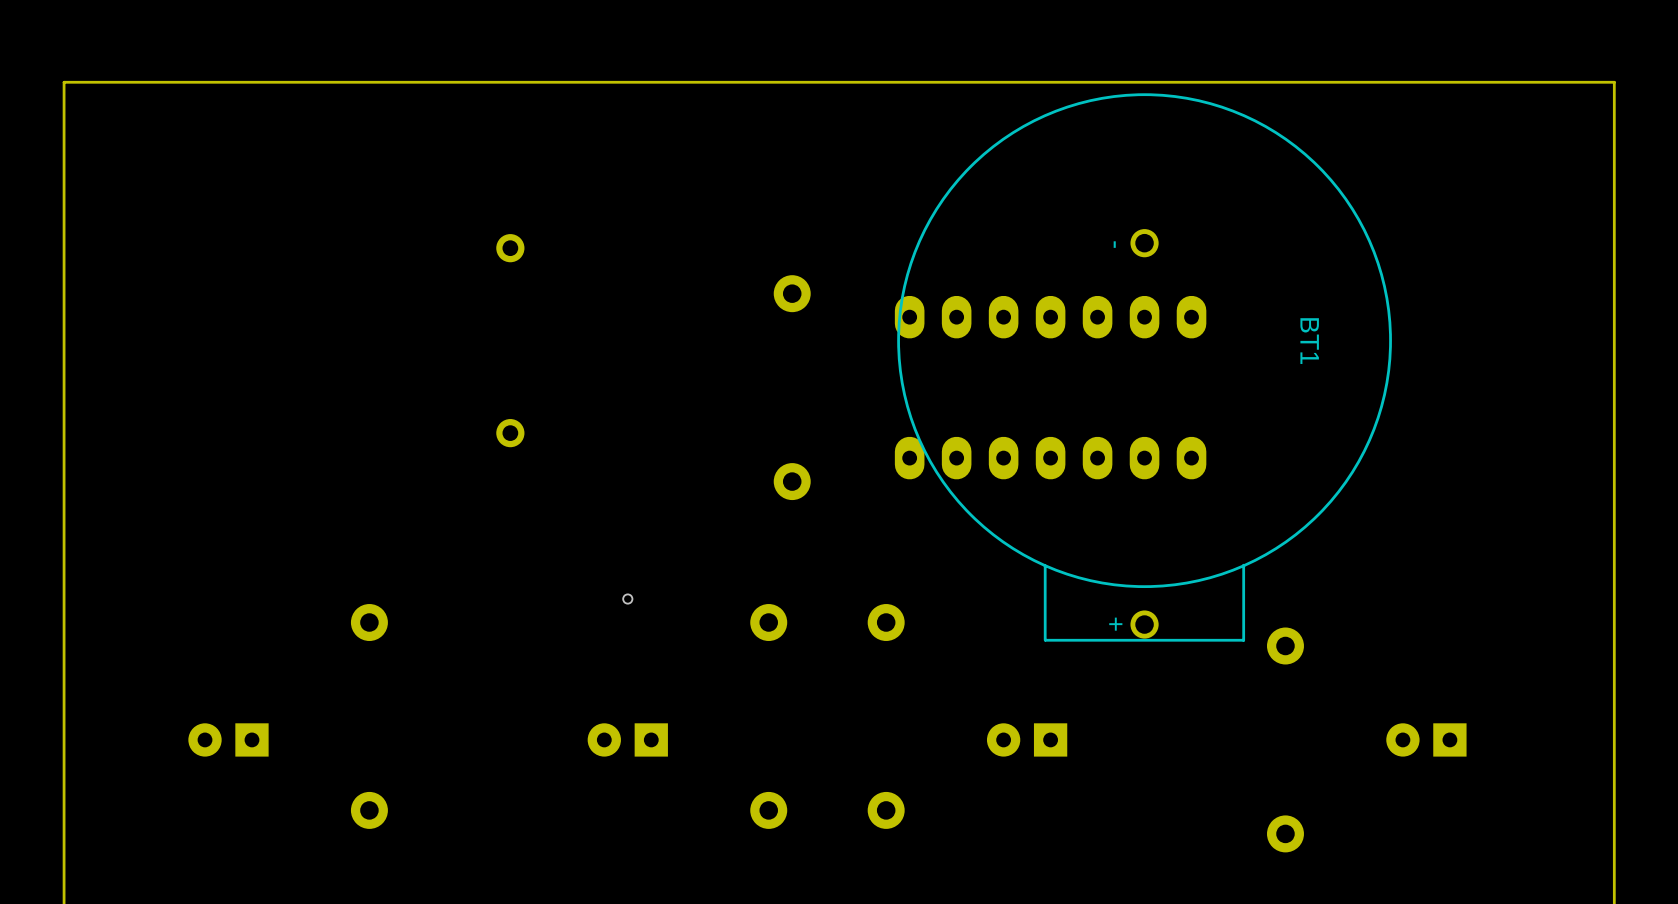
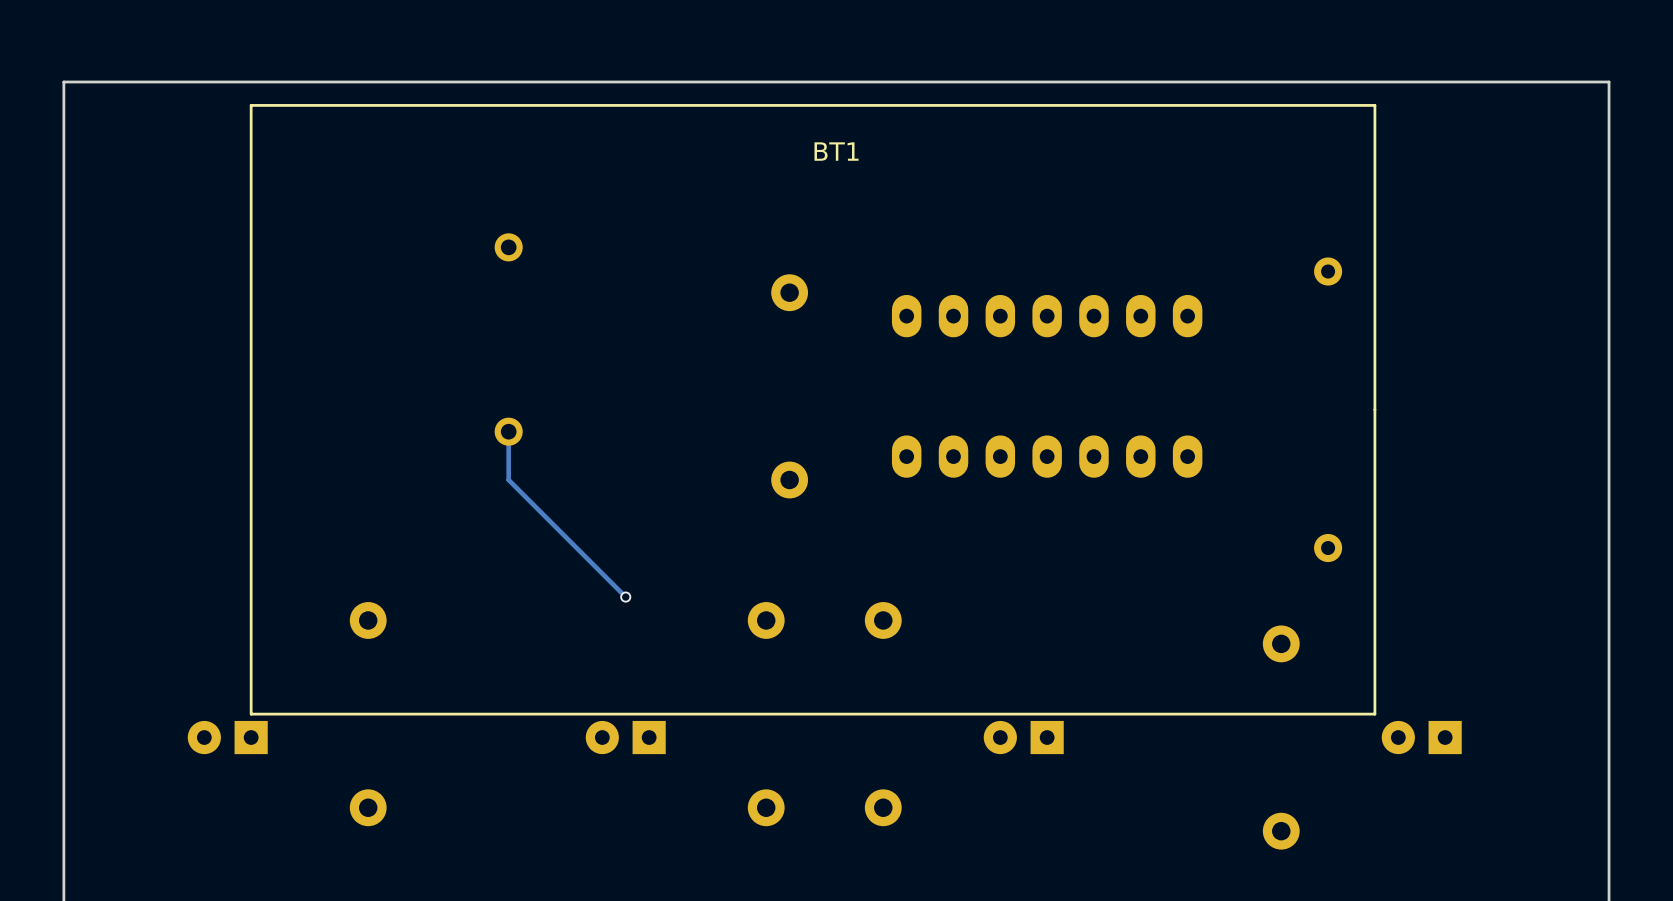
BT1 footprint: [897, 93, 1392, 642] -> [249, 104, 1377, 716]
BT1 name position: BT1 (1309, 341) -> BT1 (836, 151)
track: none -> (508, 431) (508, 480) (625, 597)

